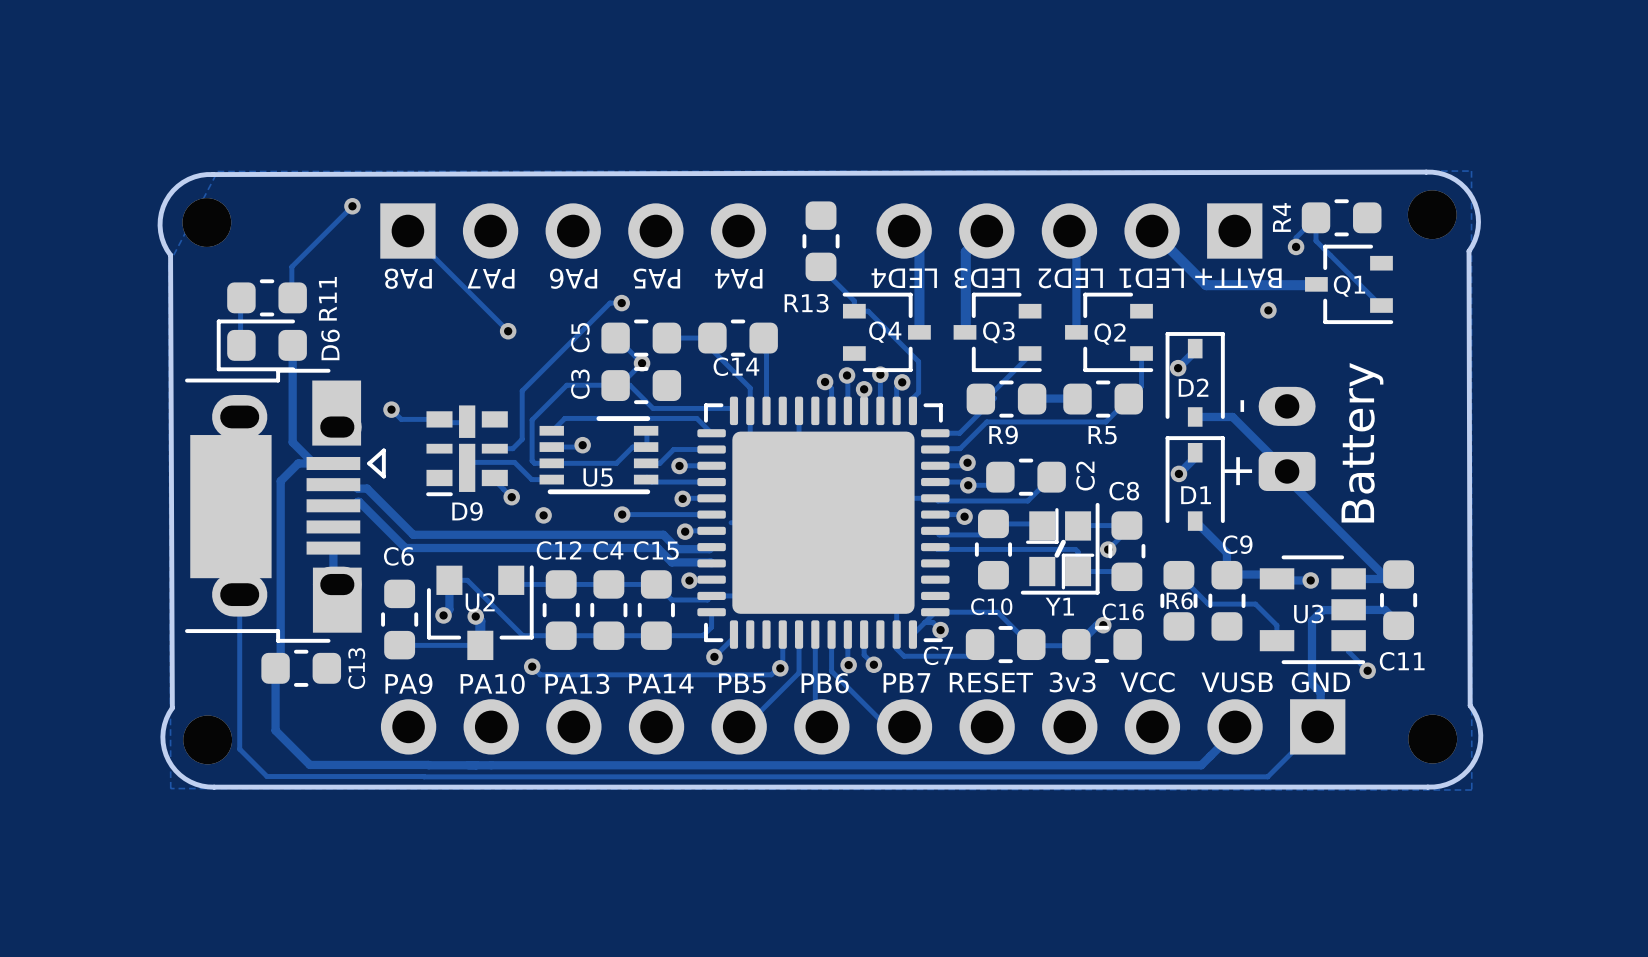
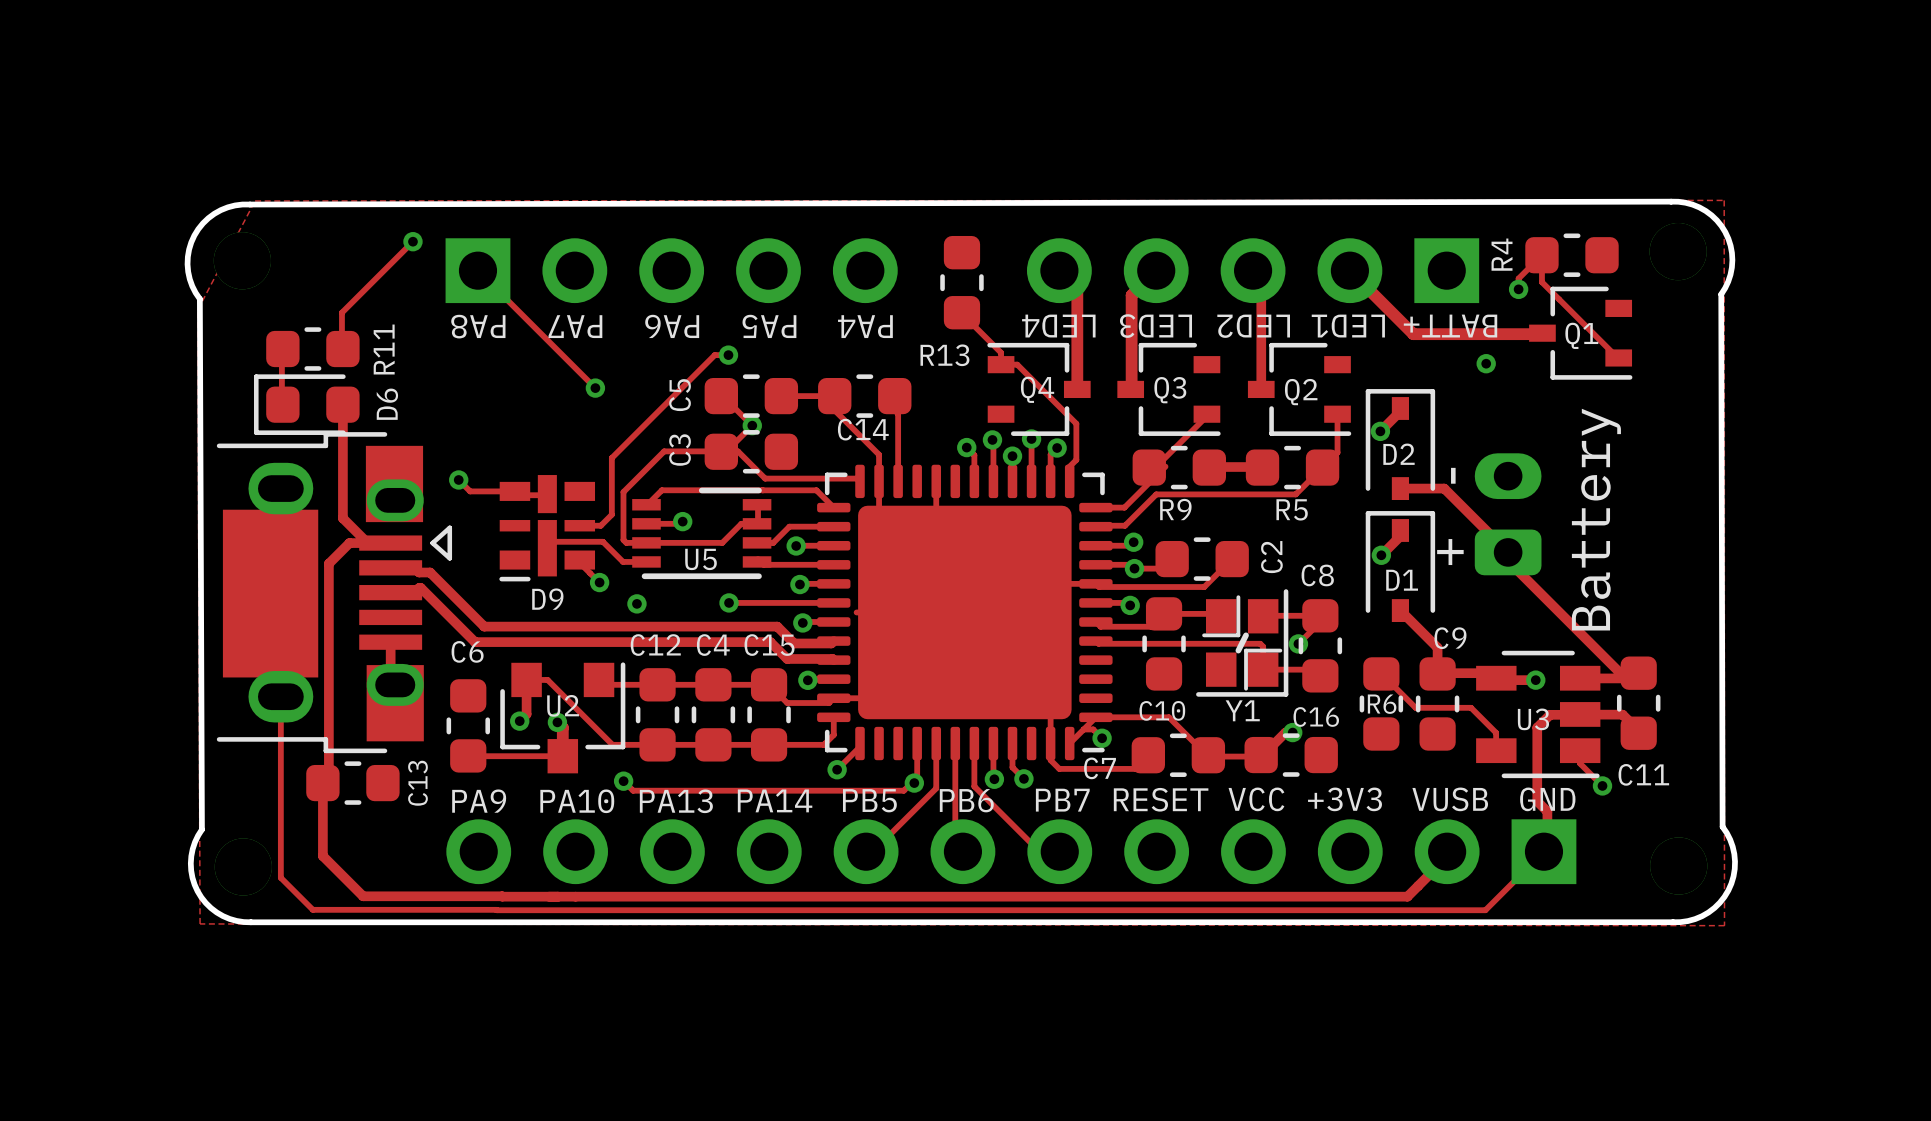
text: 3v3 (1072, 682) -> VCC (1256, 799)
text: VCC (1147, 682) -> +3V3 (1345, 799)

